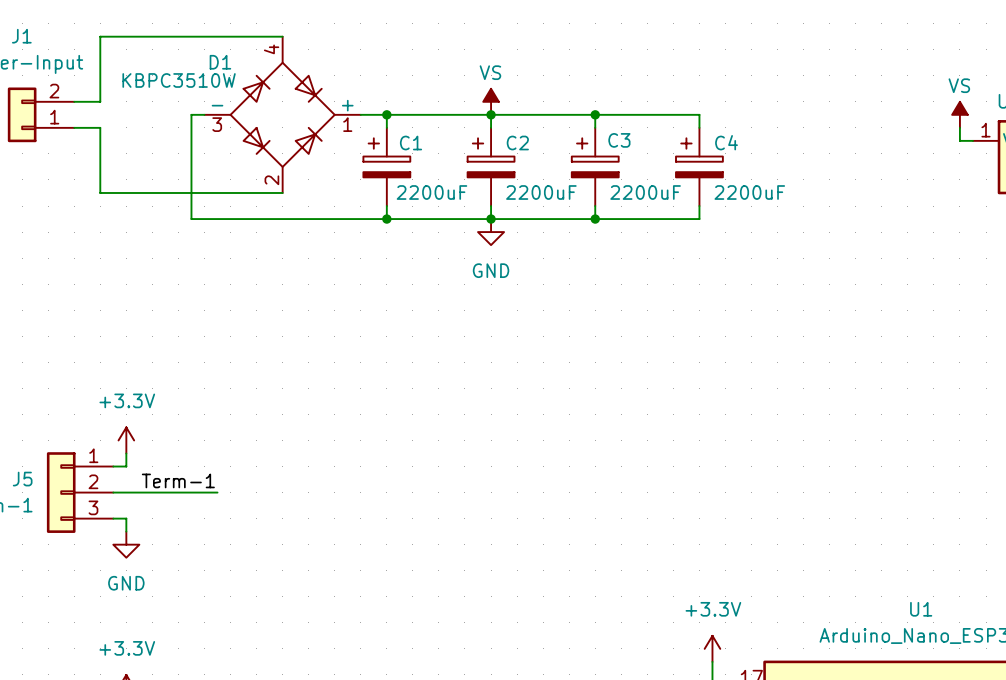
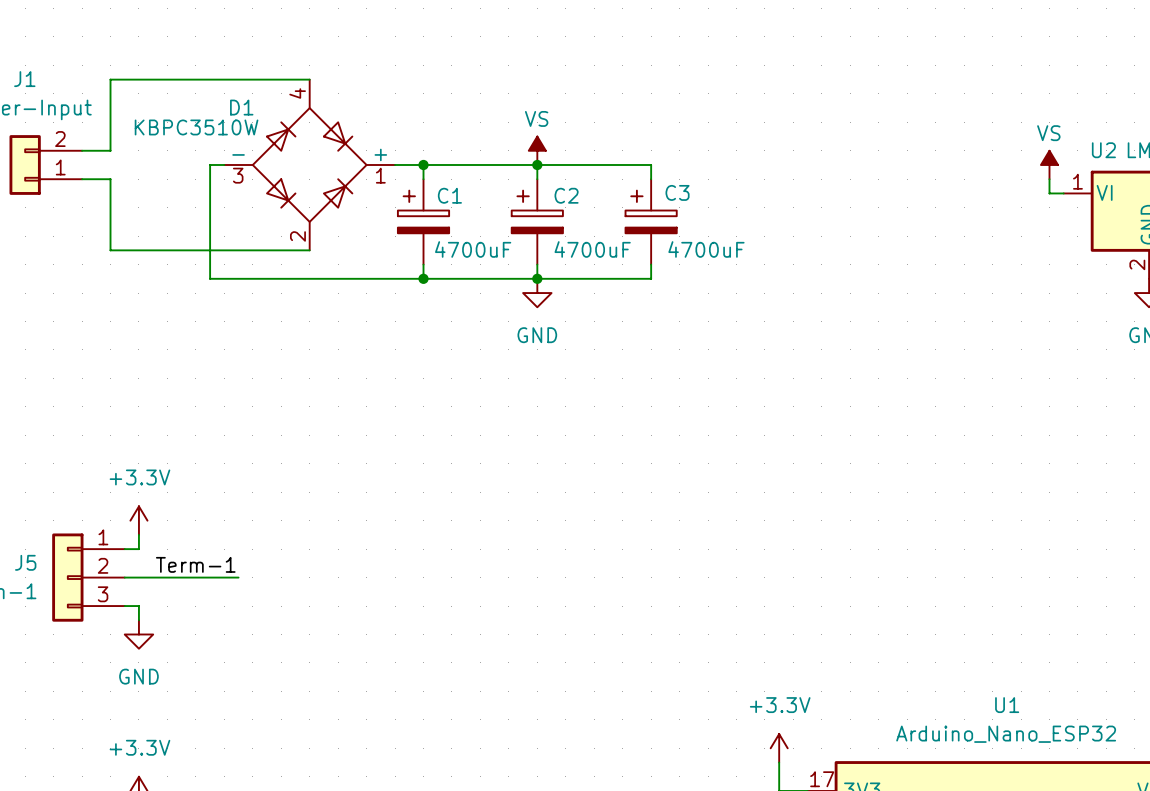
wire: (595, 114) (699, 114) (699, 127) -> none
junction: (595, 114) -> none
C4: 2200uF (699, 166) -> none
C1 value: 2200uF (431, 192) -> 4700uF (473, 249)
C2 value: 2200uF (541, 192) -> 4700uF (592, 249)
C3 value: 2200uF (645, 192) -> 4700uF (706, 249)
wire: (699, 206) (699, 219) (595, 219) -> none
junction: (595, 219) -> none

